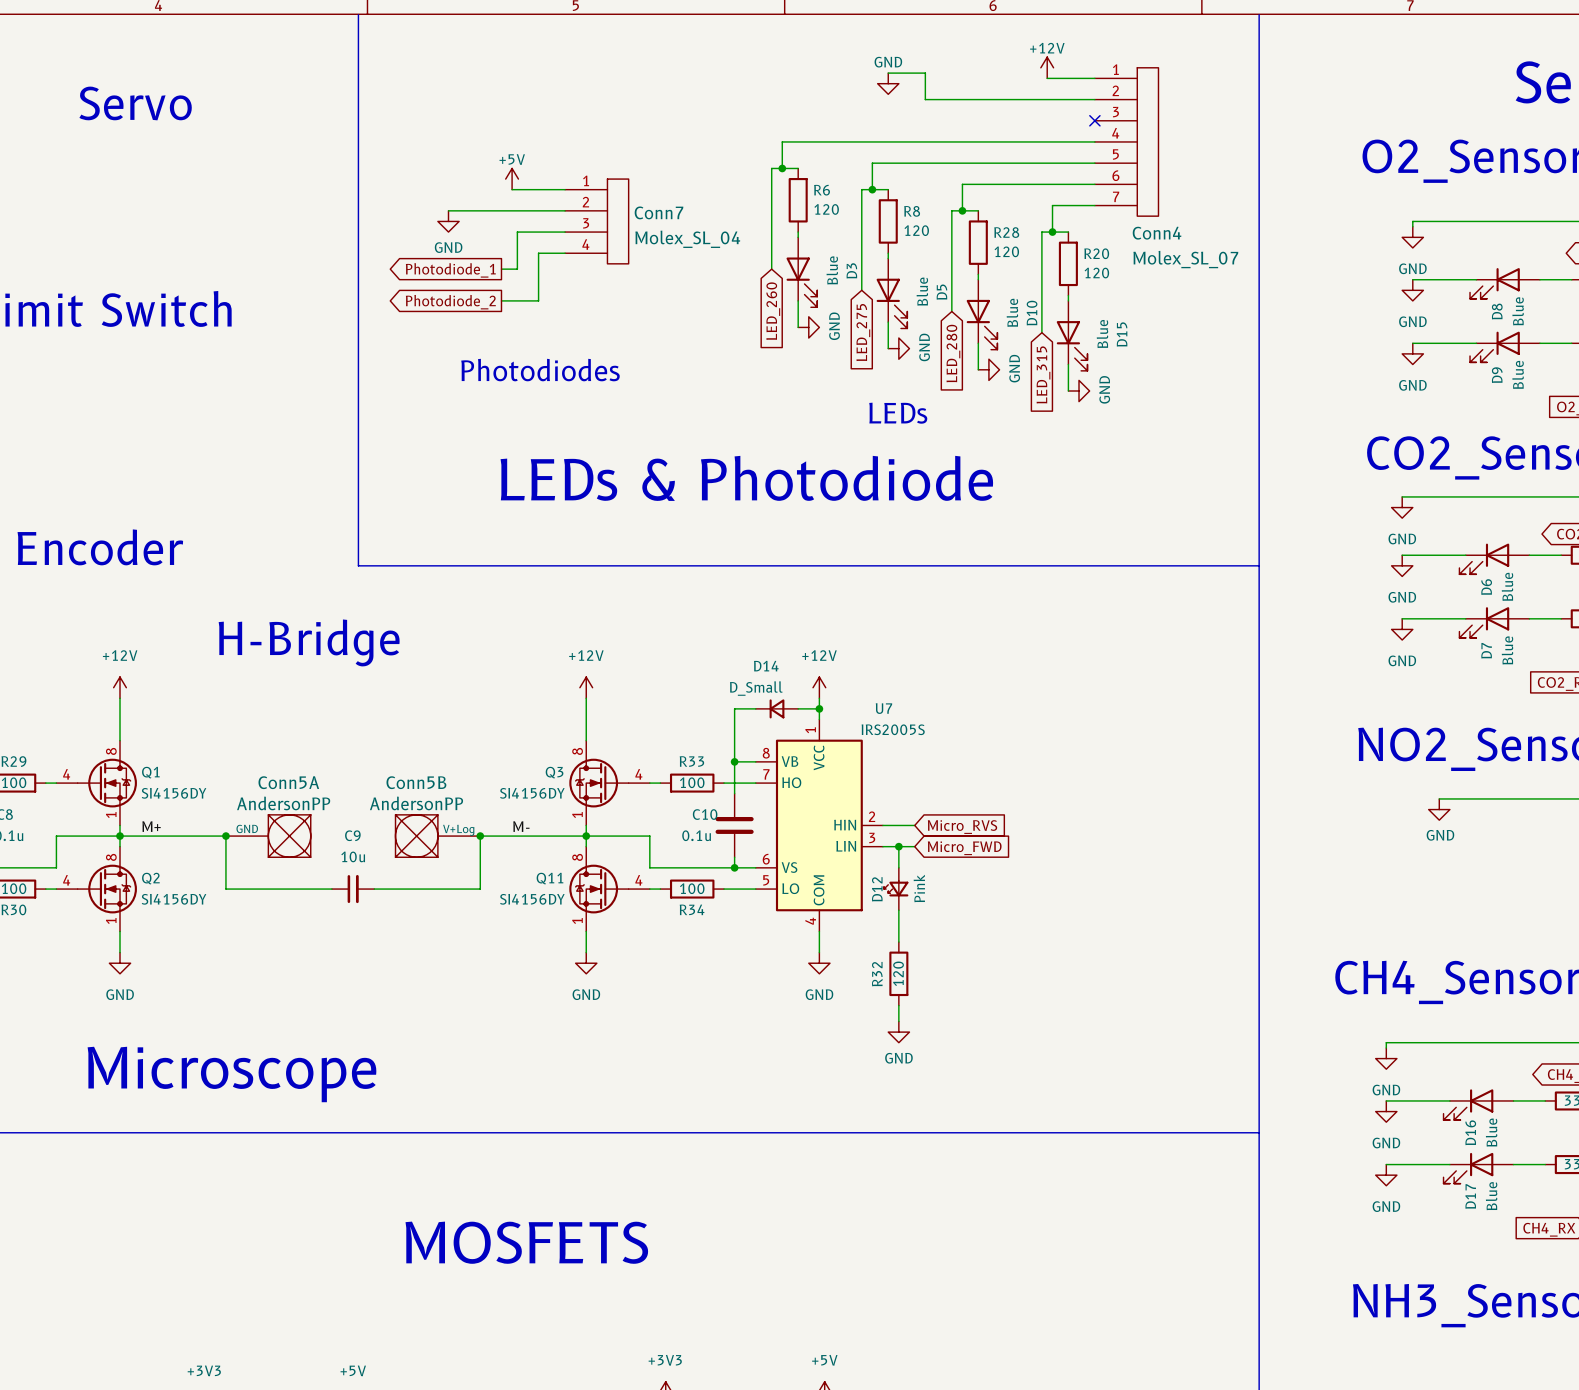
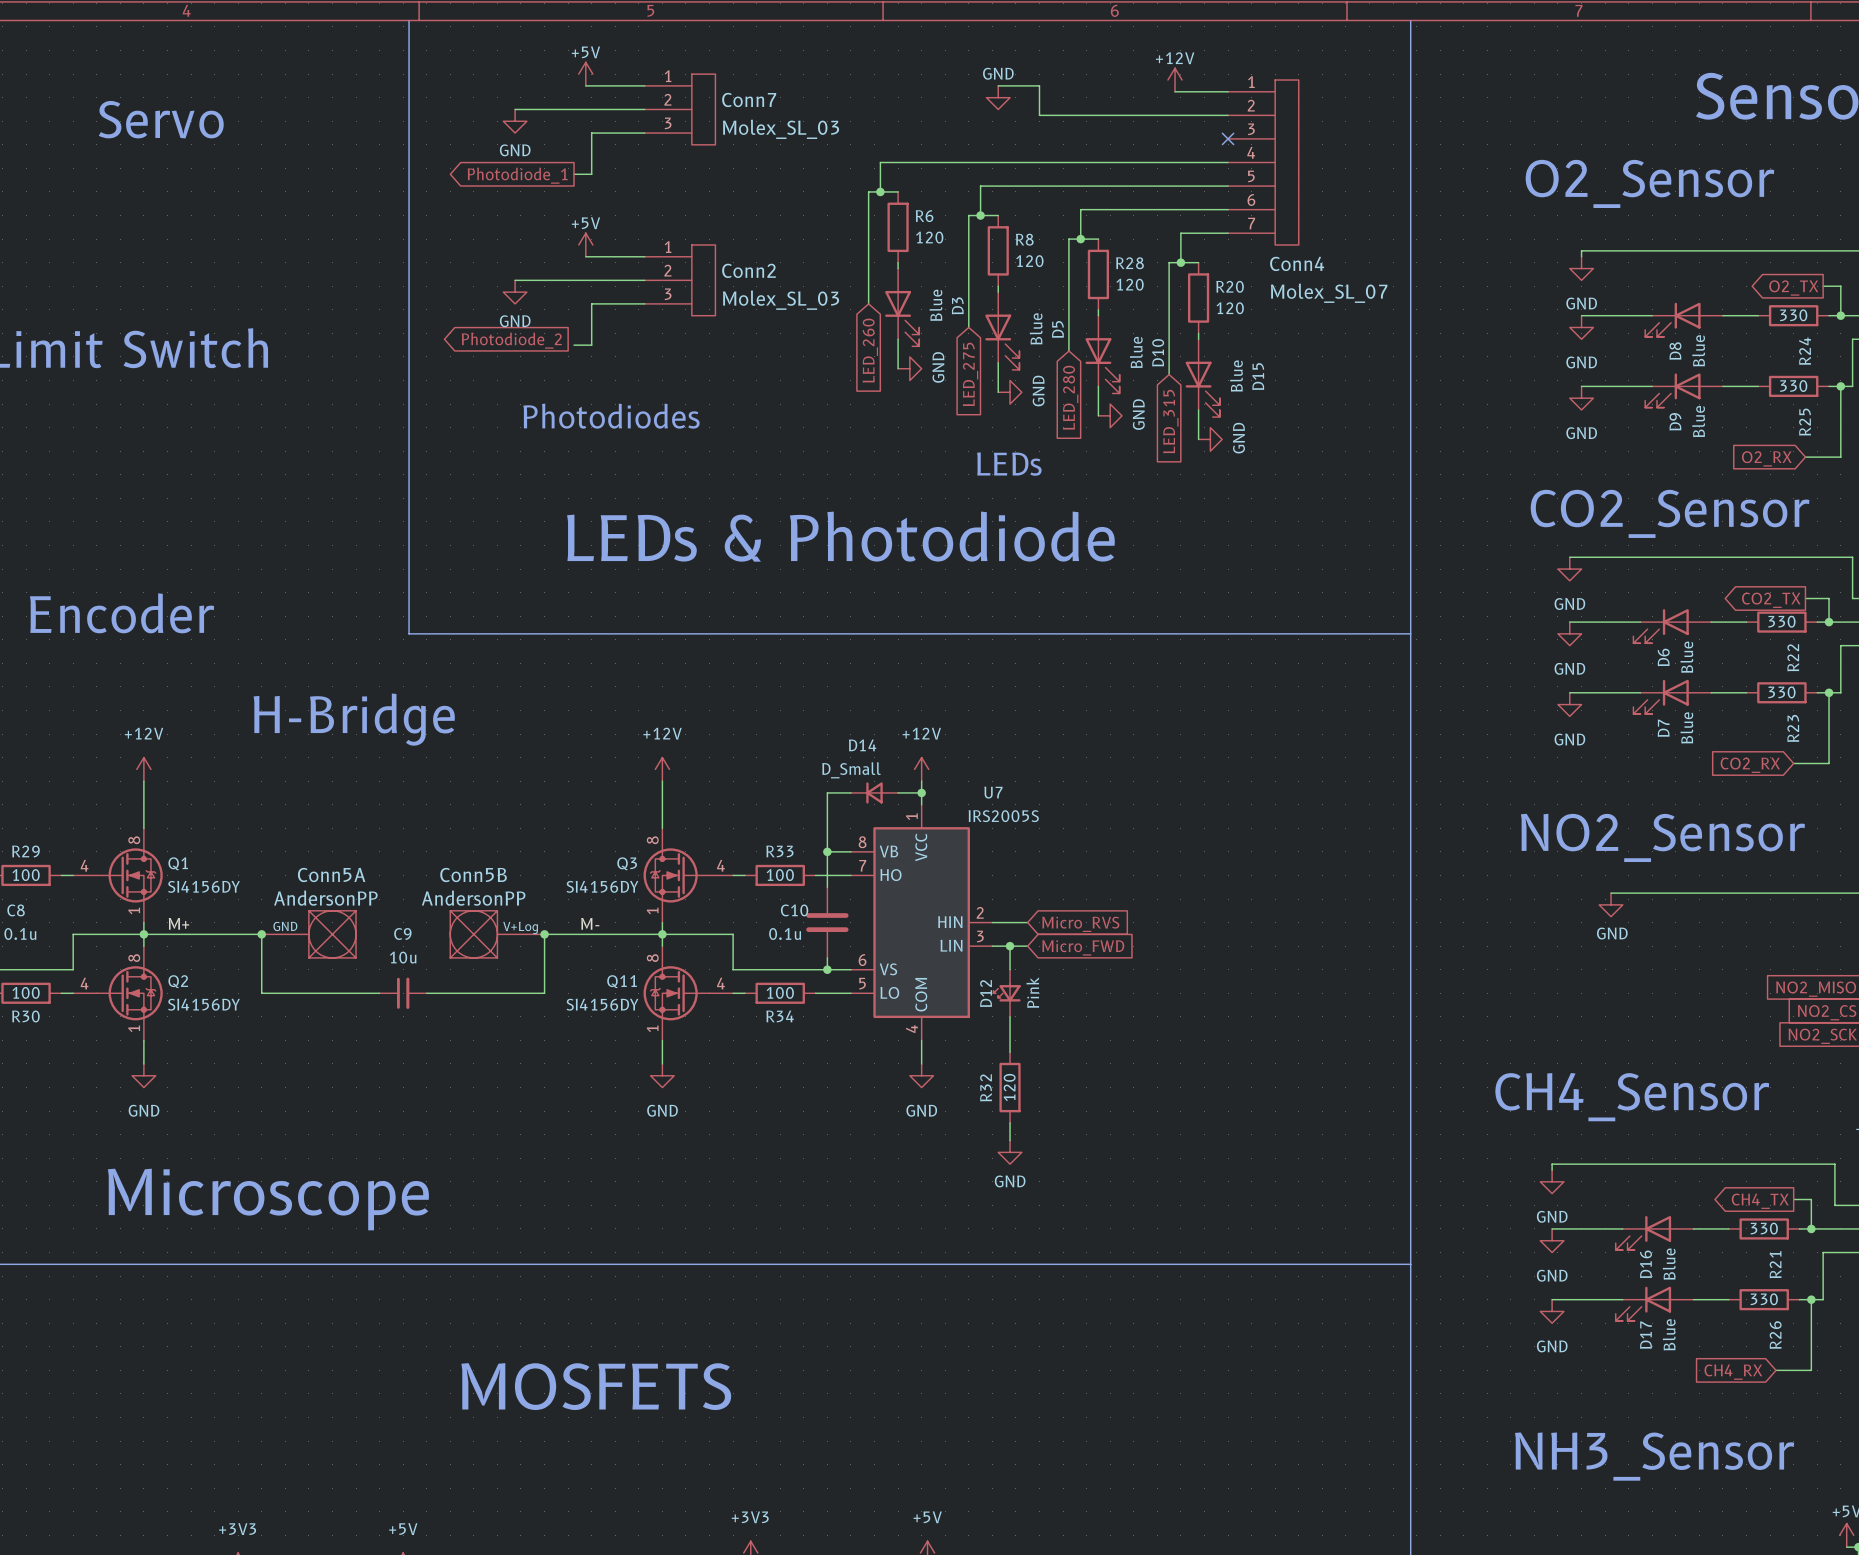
power symbol: none -> +5V (585, 74)
wire: none -> (585, 85) (644, 85)
wire: none -> (515, 109) (644, 109)
power symbol: none -> GND (515, 121)
wire: none -> (644, 133) (591, 133) (591, 174) (574, 174)
power symbol position: +5V (512, 179) -> +5V (585, 244)
Conn7 symbol: [565, 179, 629, 264] -> [644, 74, 716, 145]
wire: (512, 189) (565, 189) -> (585, 256) (644, 256)
wire: (448, 210) (565, 210) -> (515, 280) (644, 280)
power symbol position: GND (448, 221) -> GND (515, 292)
wire: (565, 232) (517, 232) (517, 269) (501, 269) -> (644, 303) (591, 303) (591, 345) (574, 345)
Conn7 value: Molex_SL_04 (687, 239) -> Molex_SL_03 (781, 129)
Conn2: none -> Molex_SL_03 (680, 280)
wire: (565, 253) (538, 253) (538, 300) (501, 300) -> none
global label position: Photodiode_1 (450, 270) -> Photodiode_1 (517, 175)

